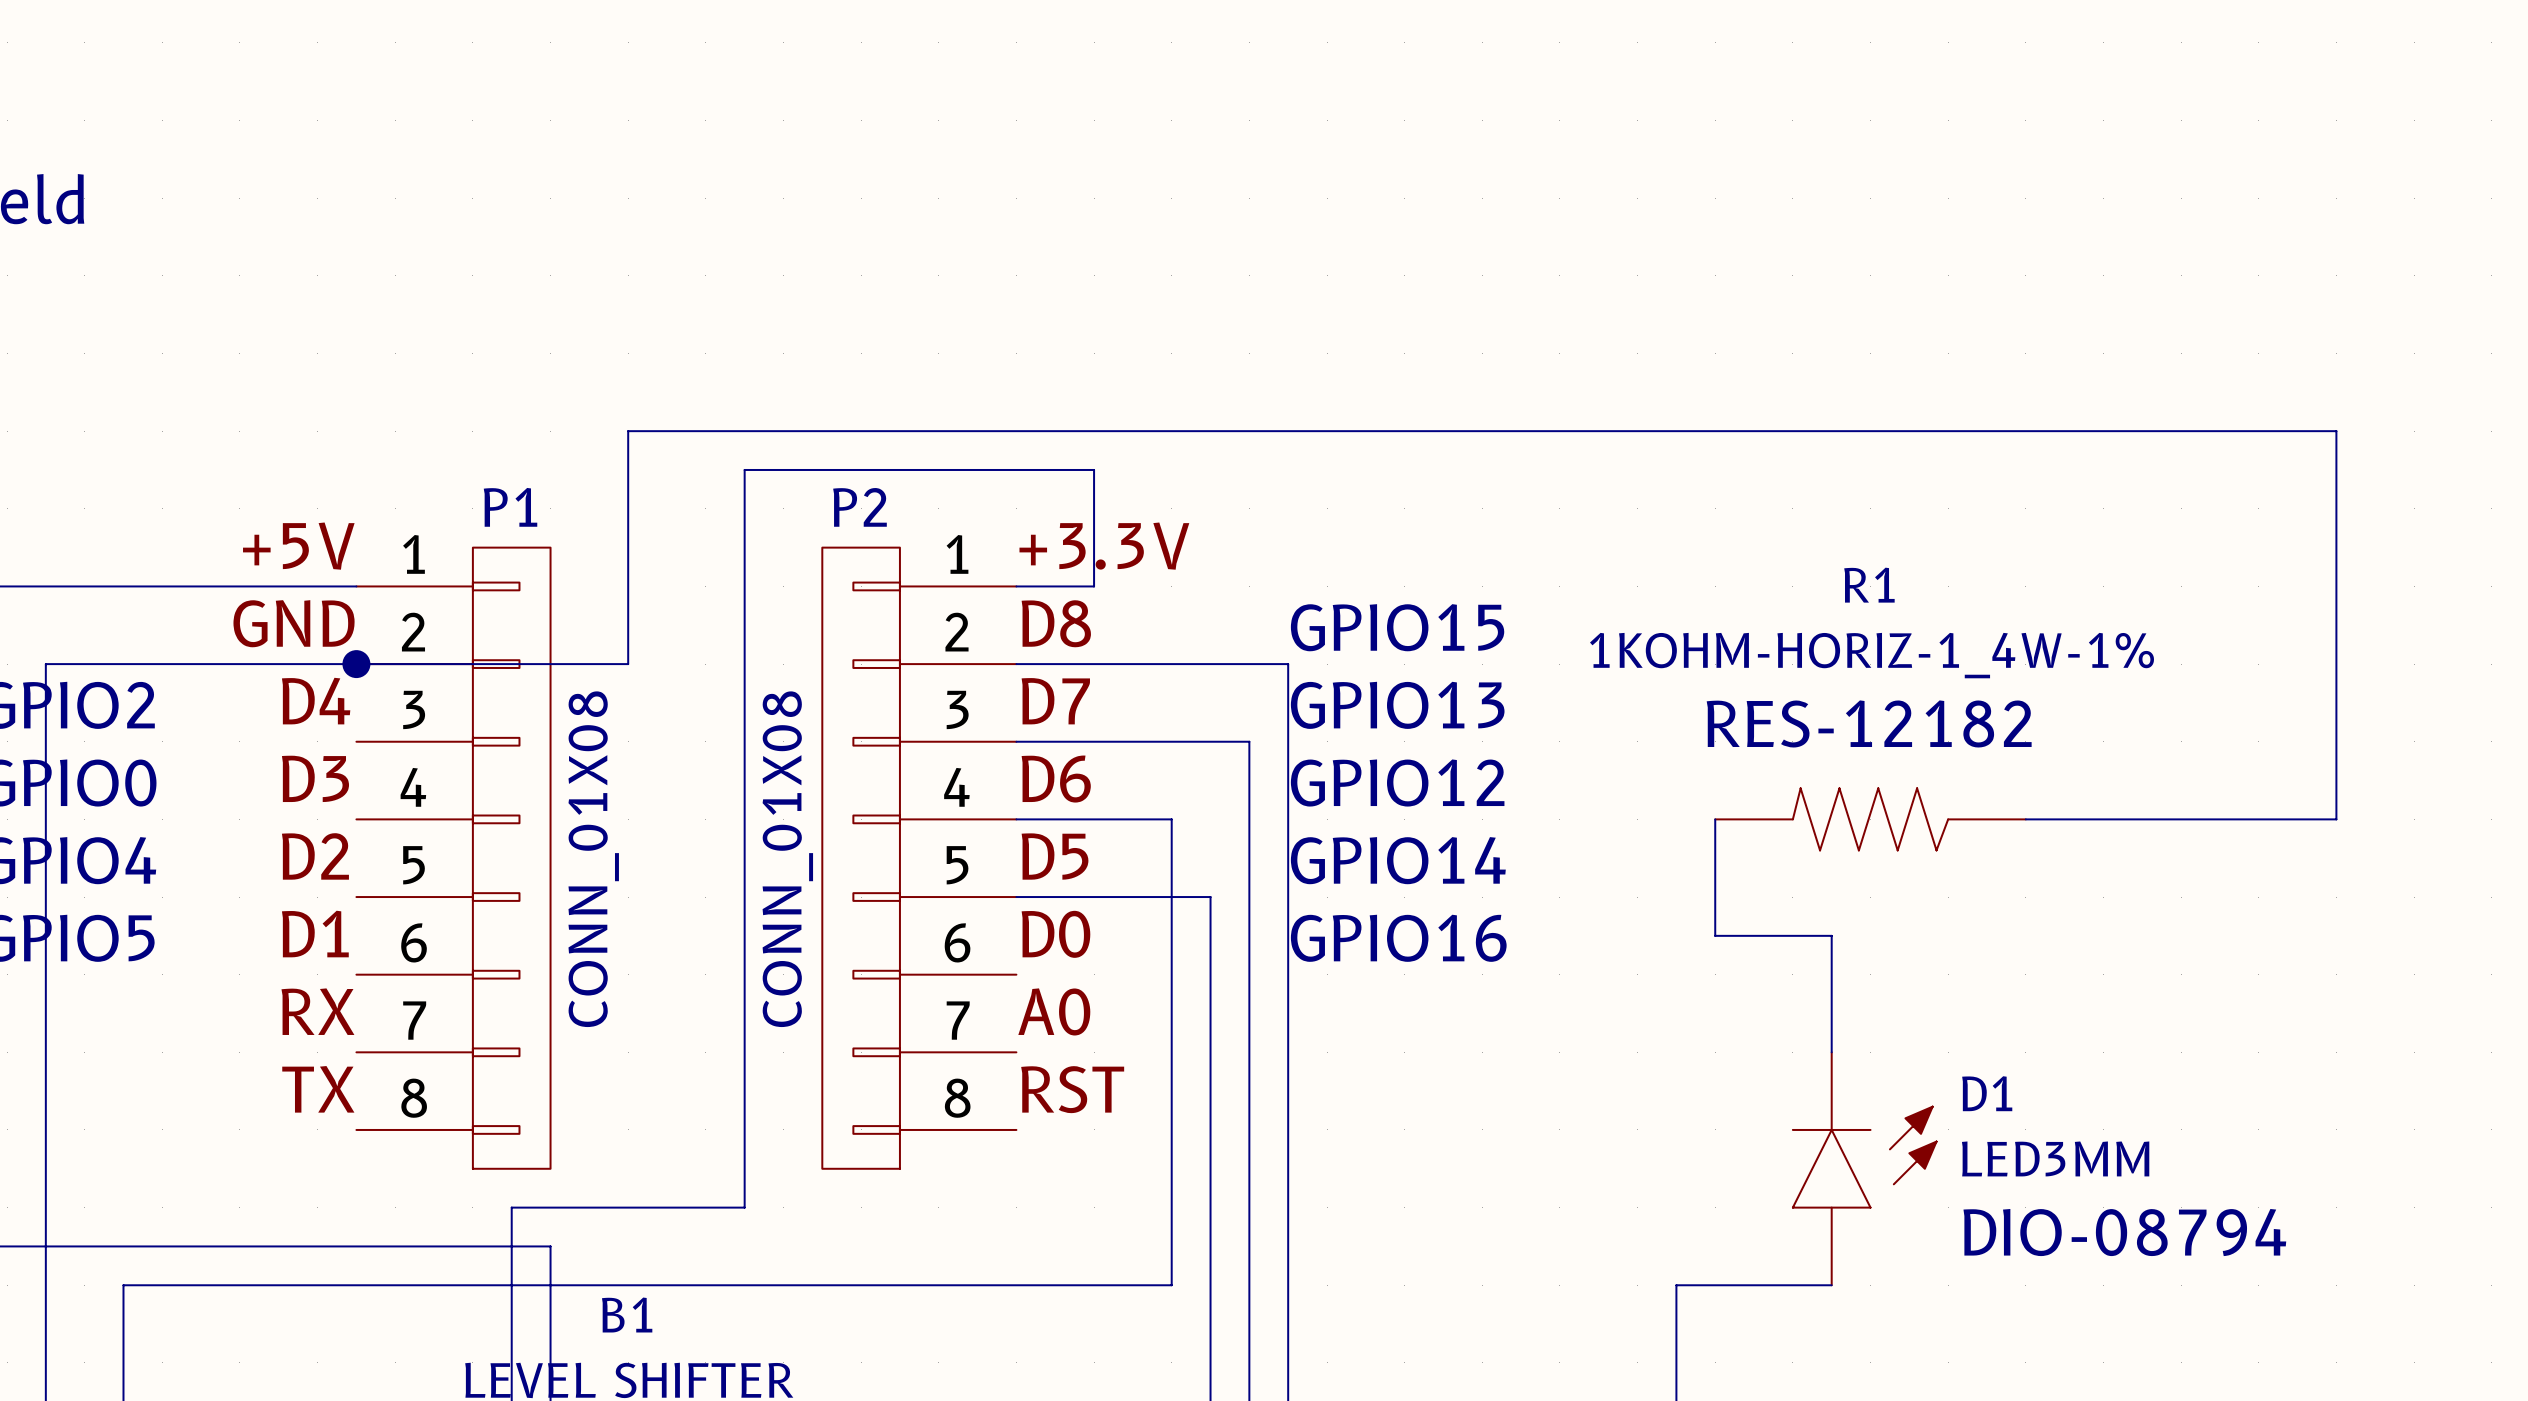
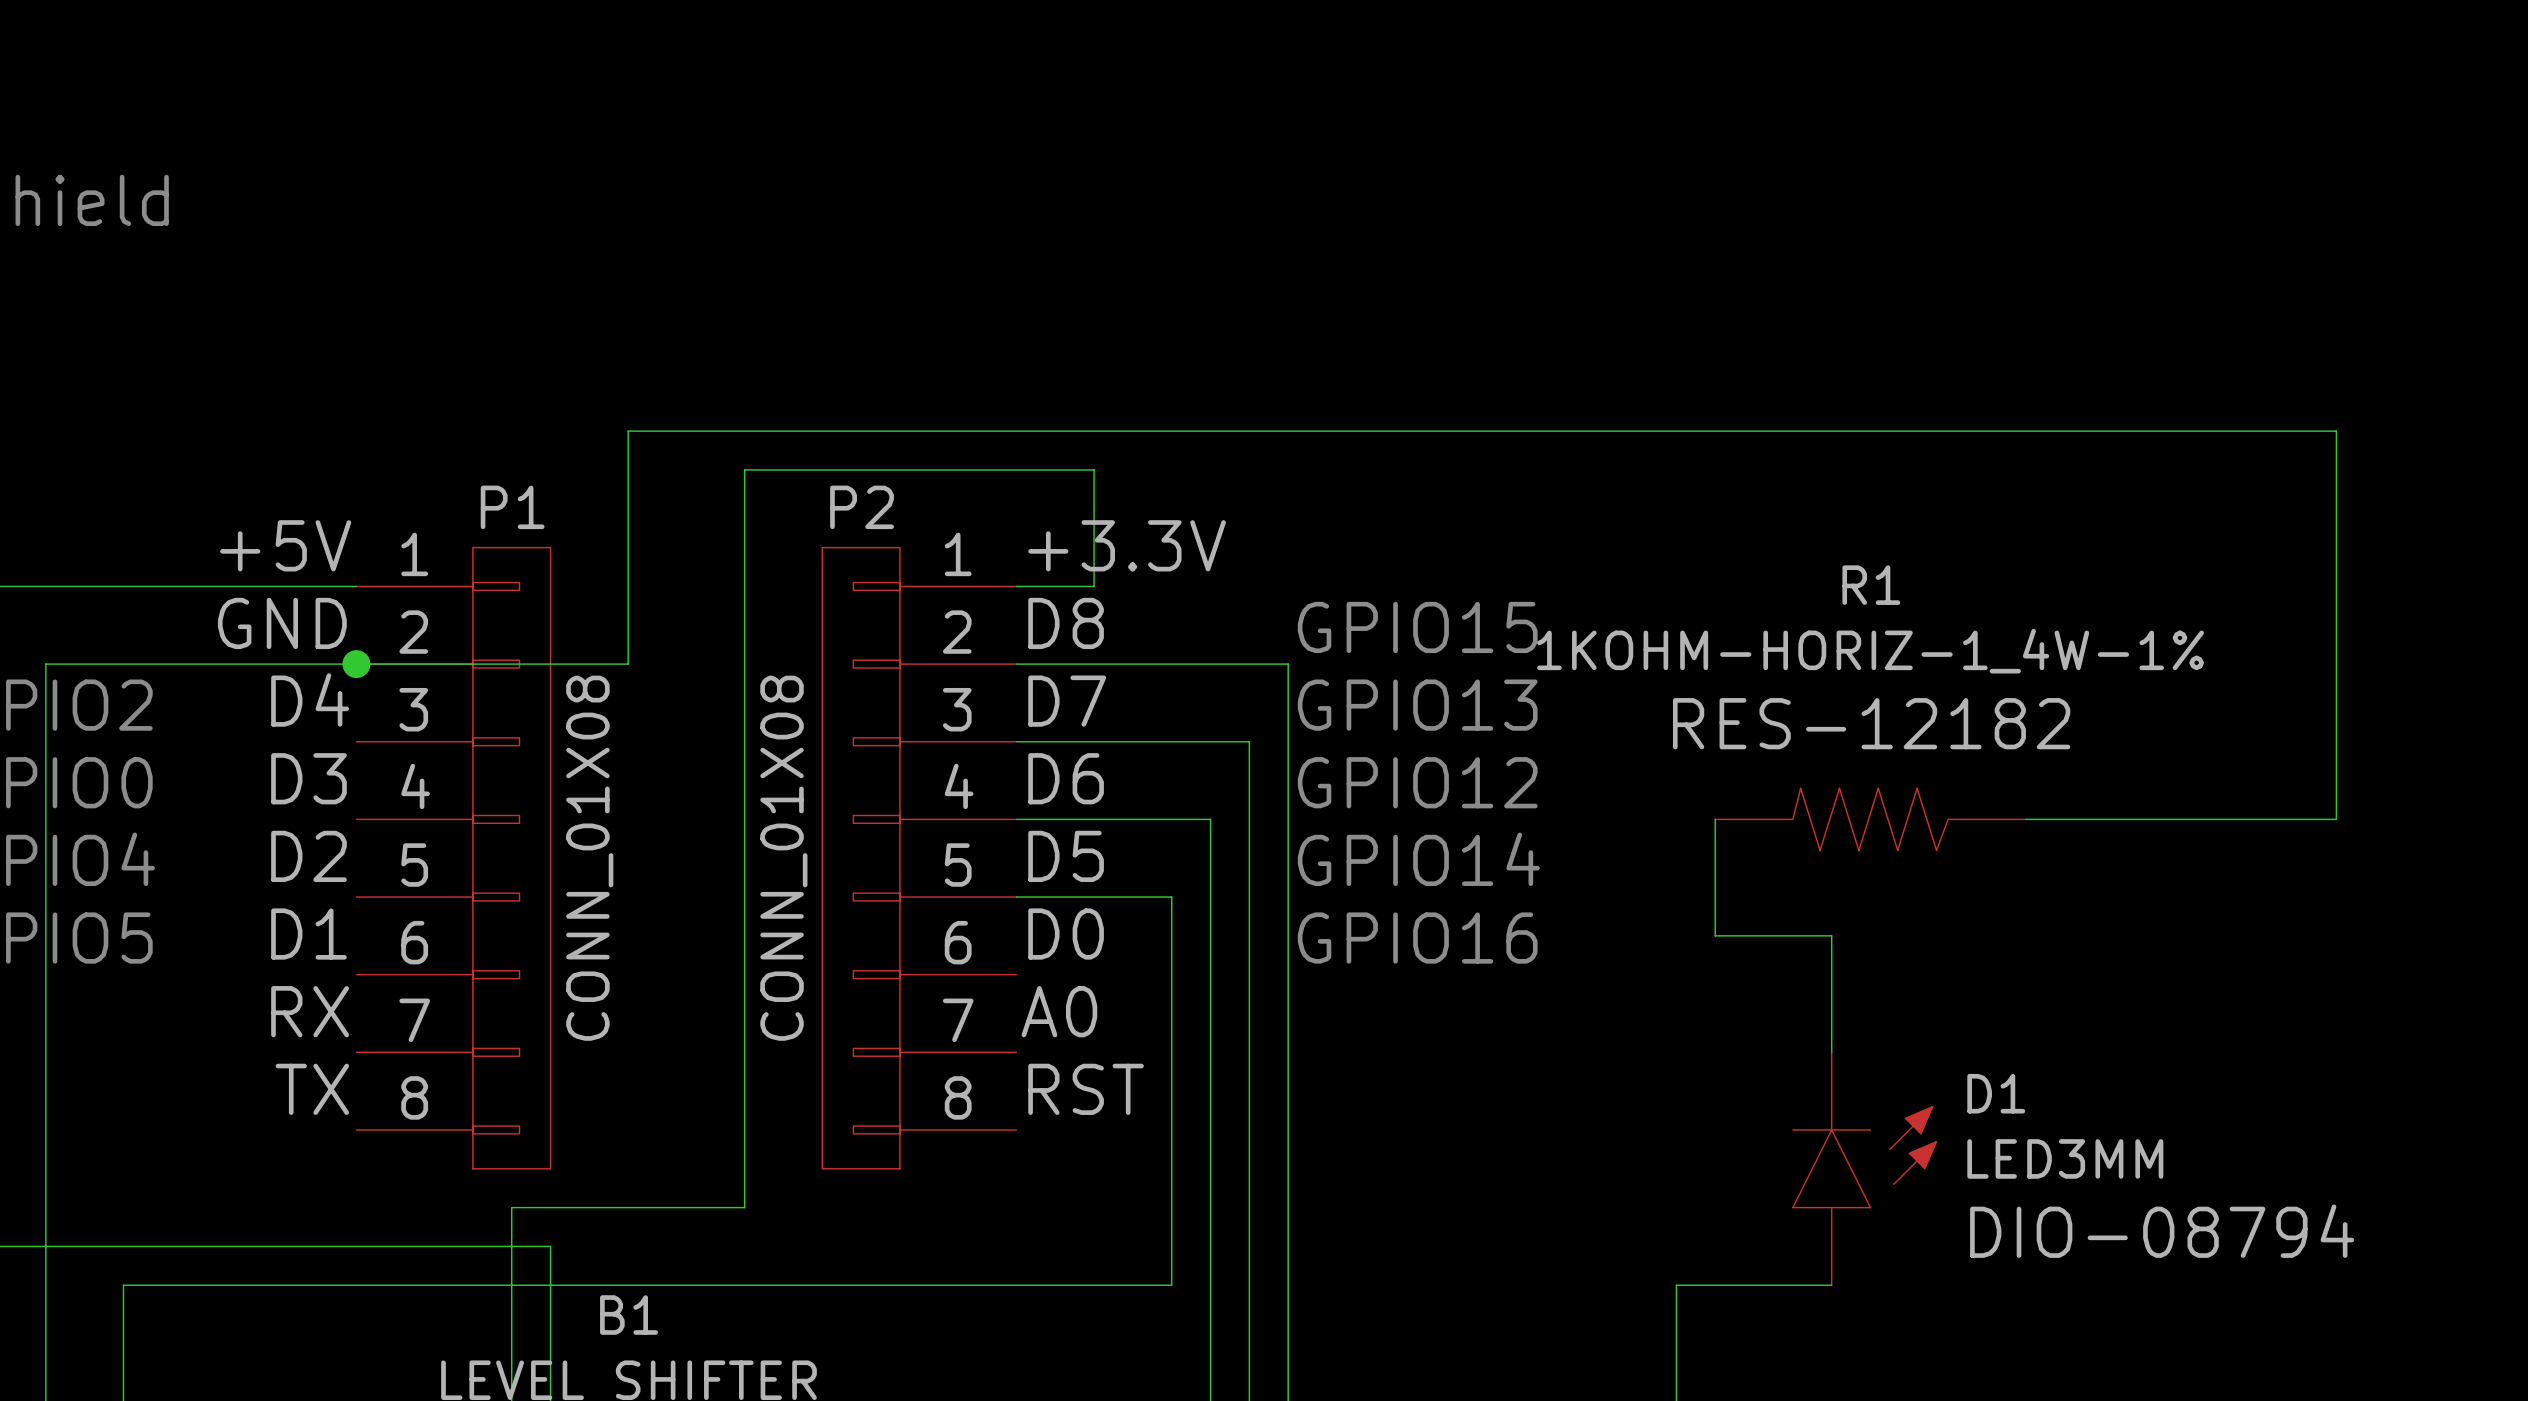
wire: (1171, 819) (1171, 897) (1210, 897) -> (1171, 819) (1210, 819) (1210, 897)

